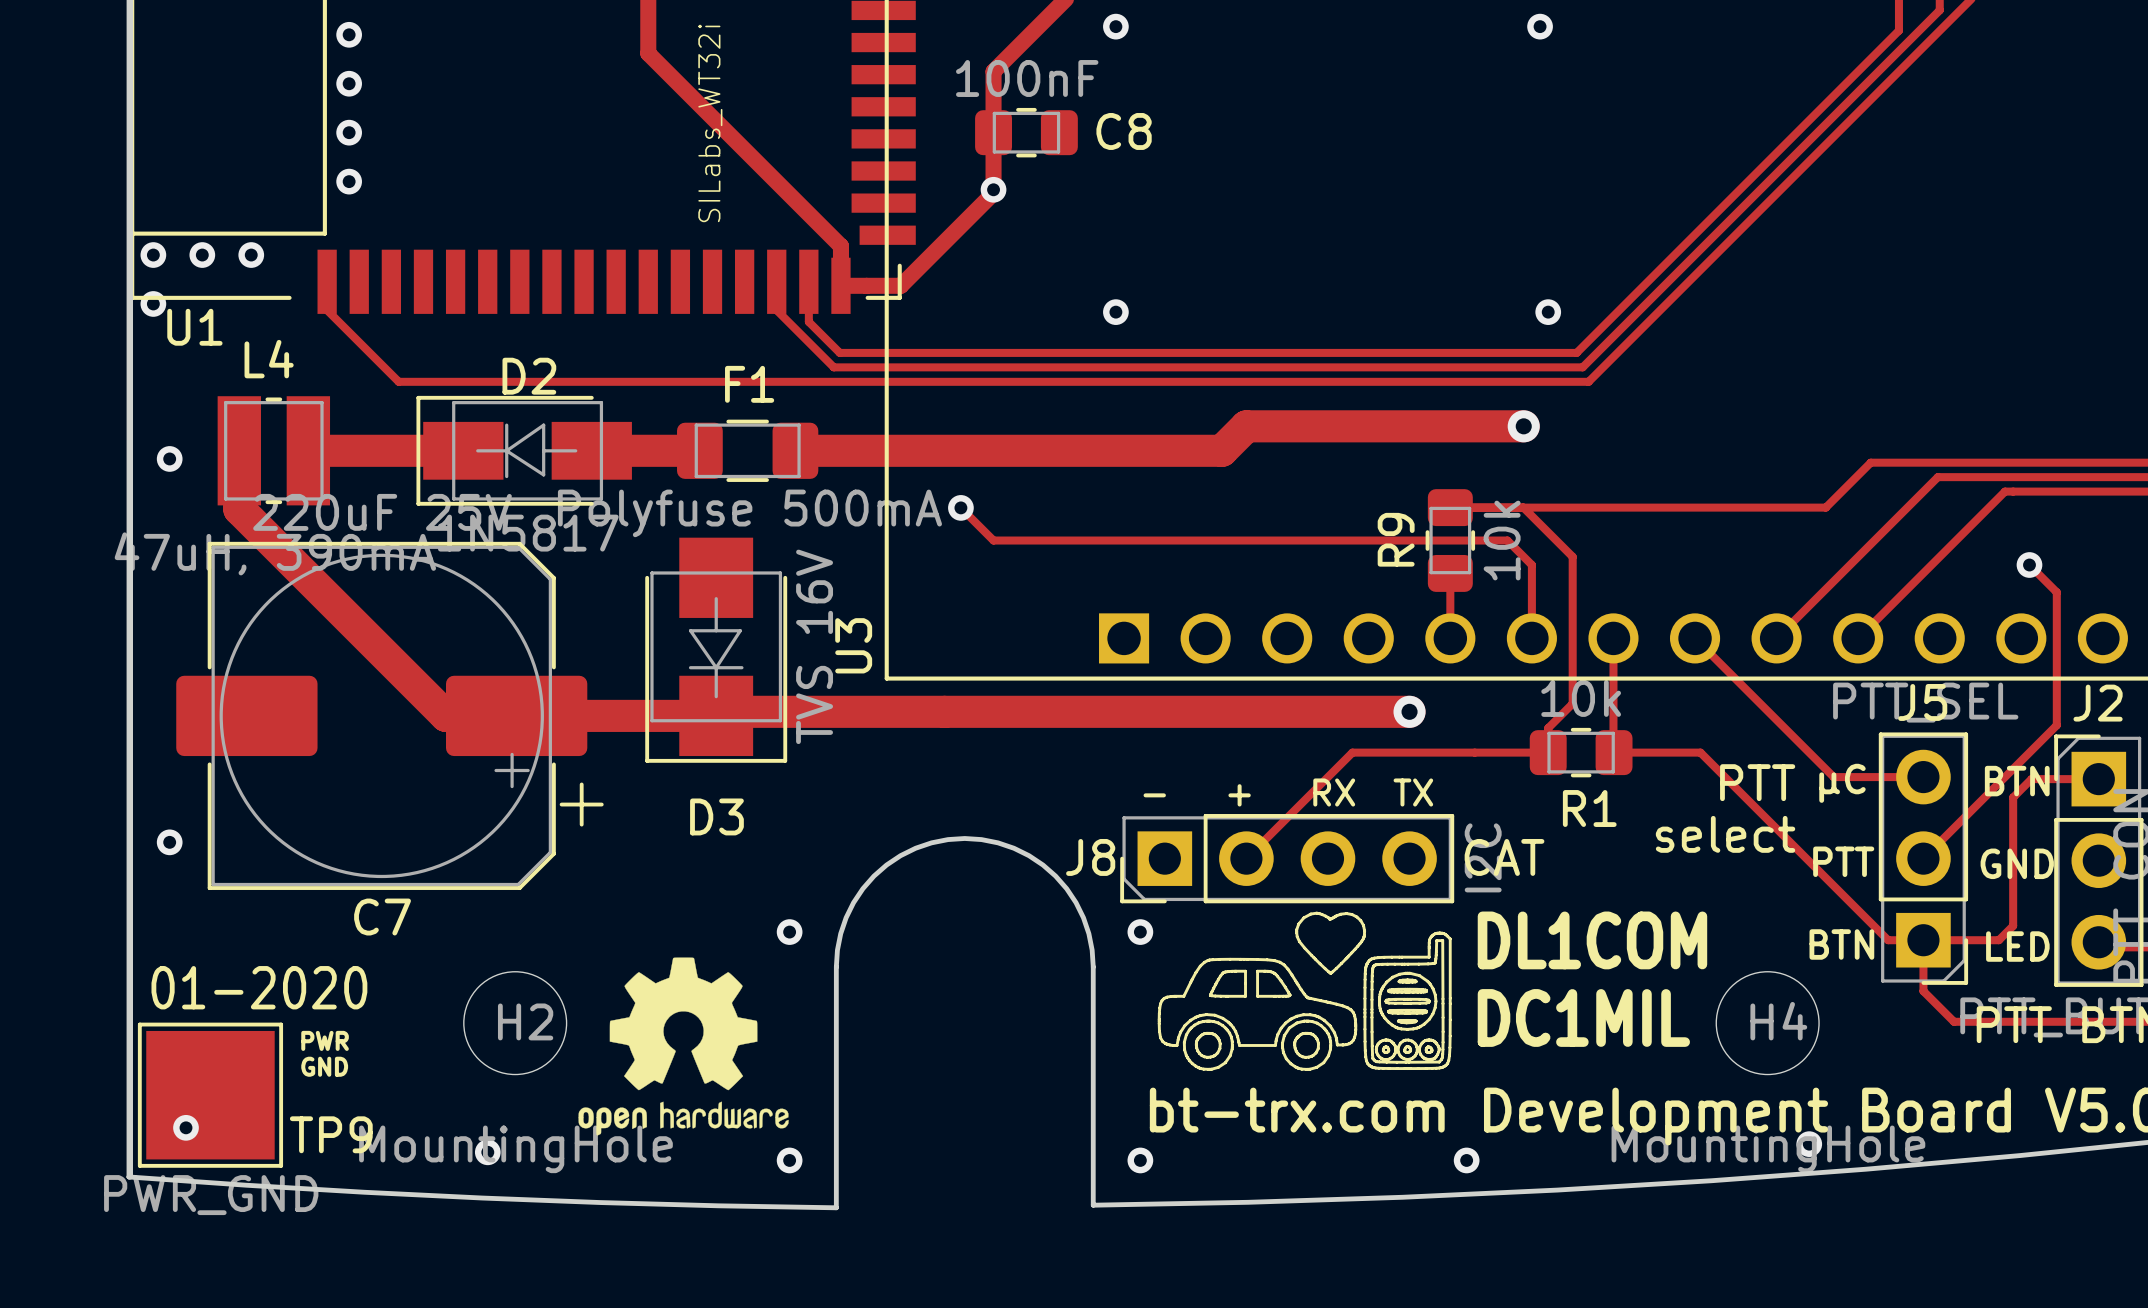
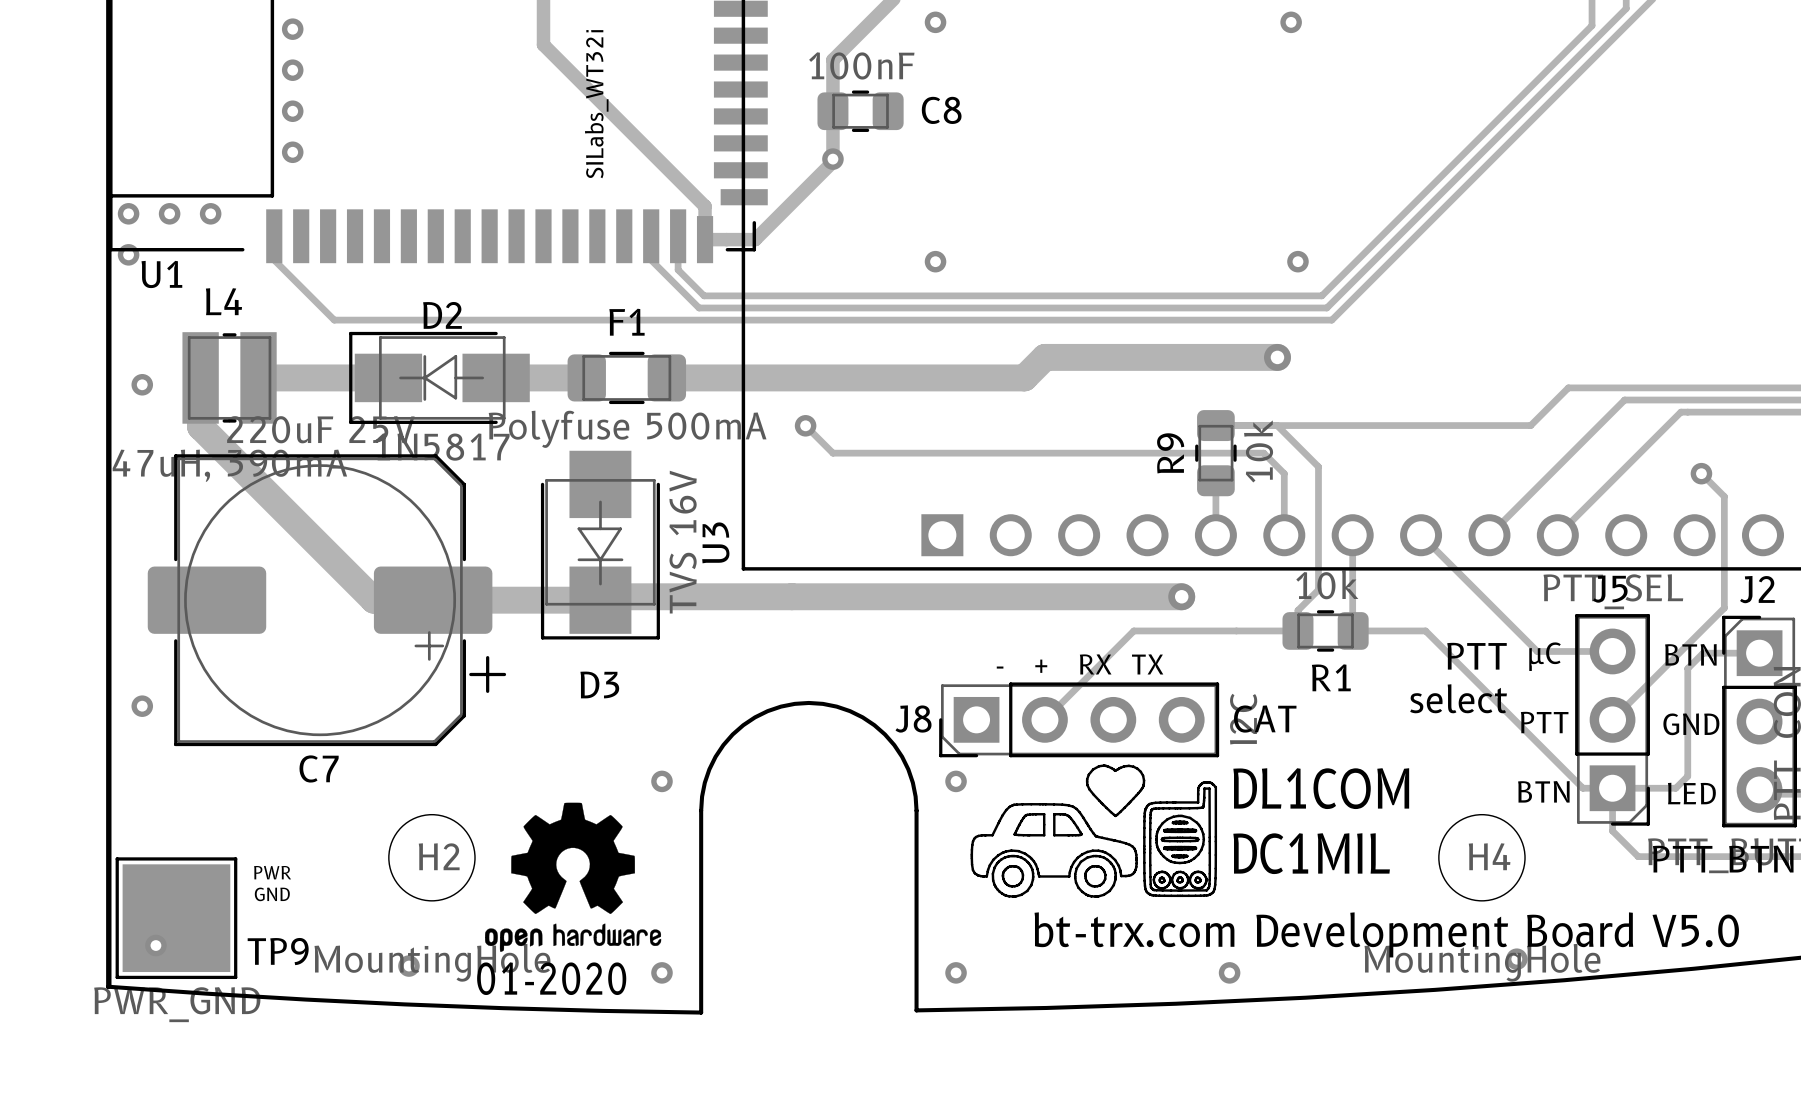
text position: 01-2020 (259, 987) -> 01-2020 (551, 978)

